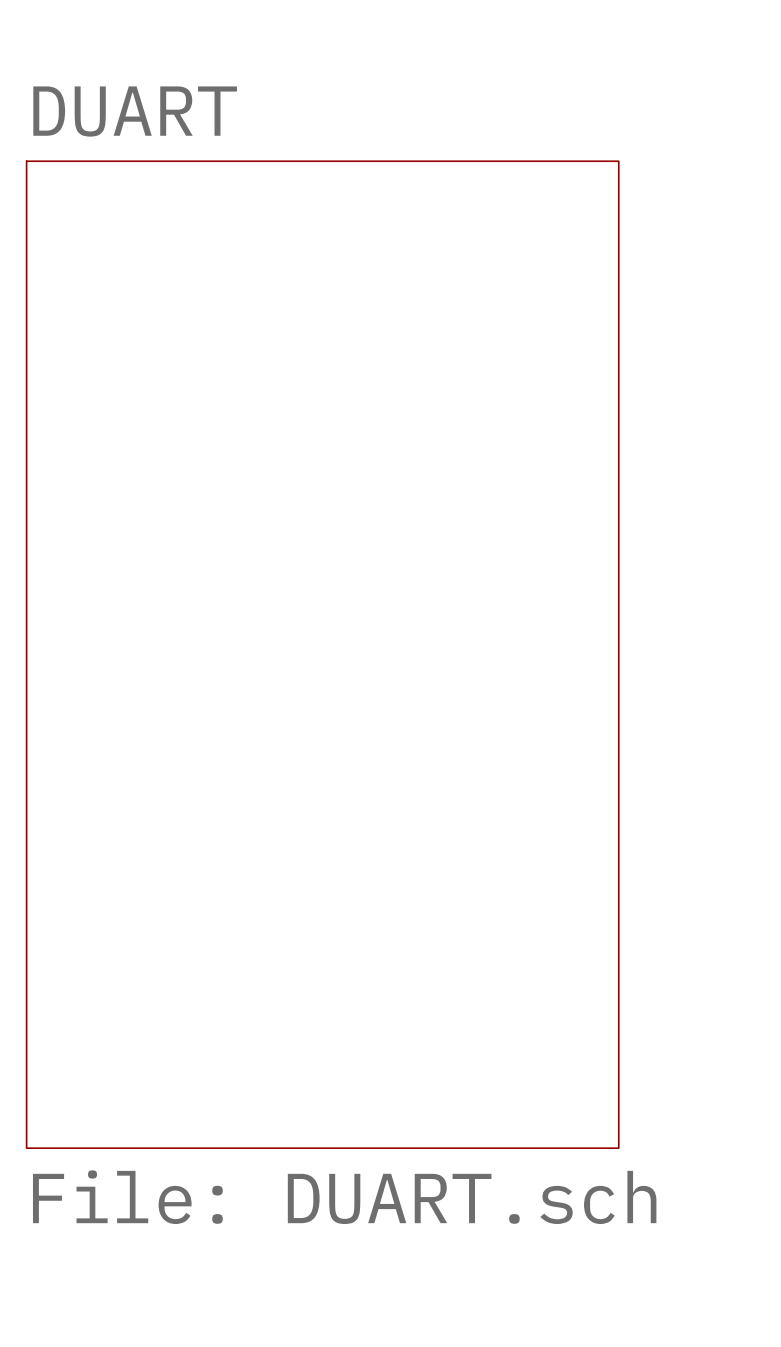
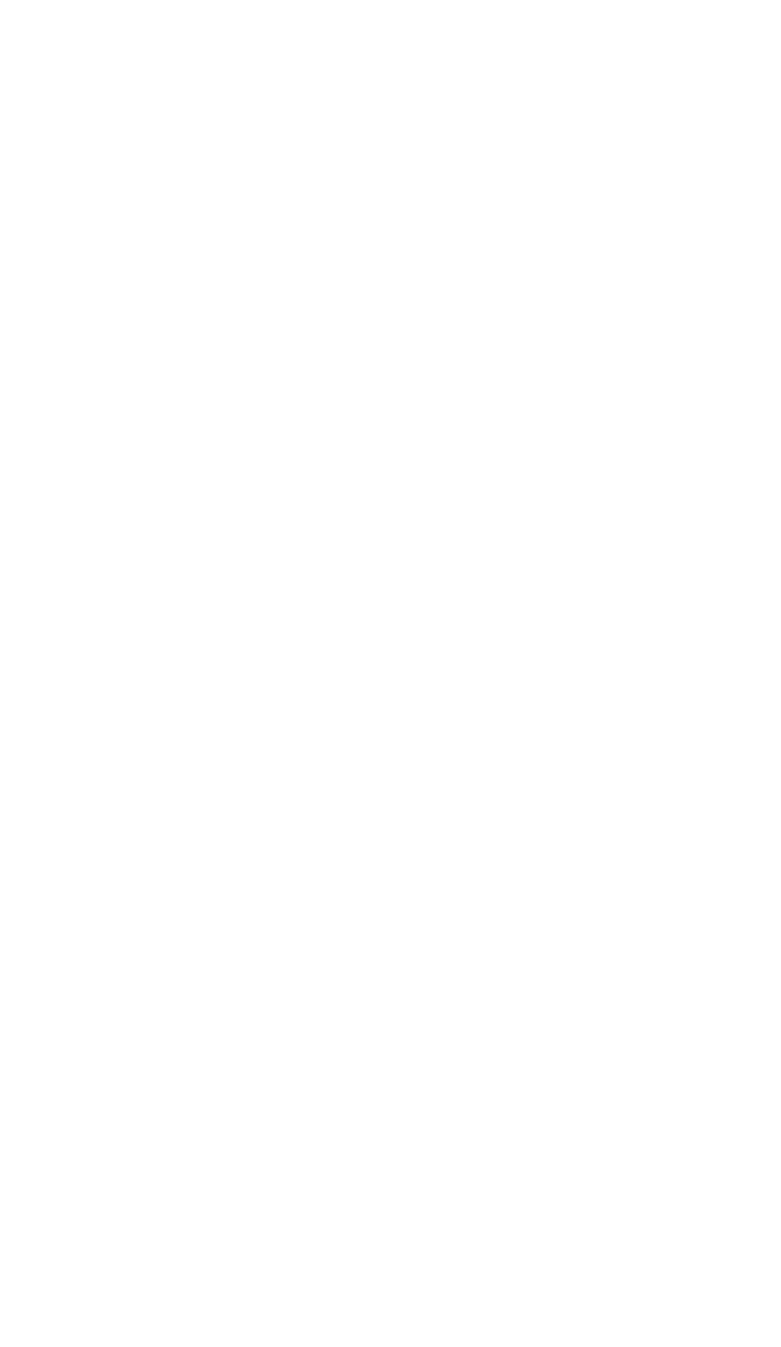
sheet DUART: File: DUART.sch (322, 654) -> none

